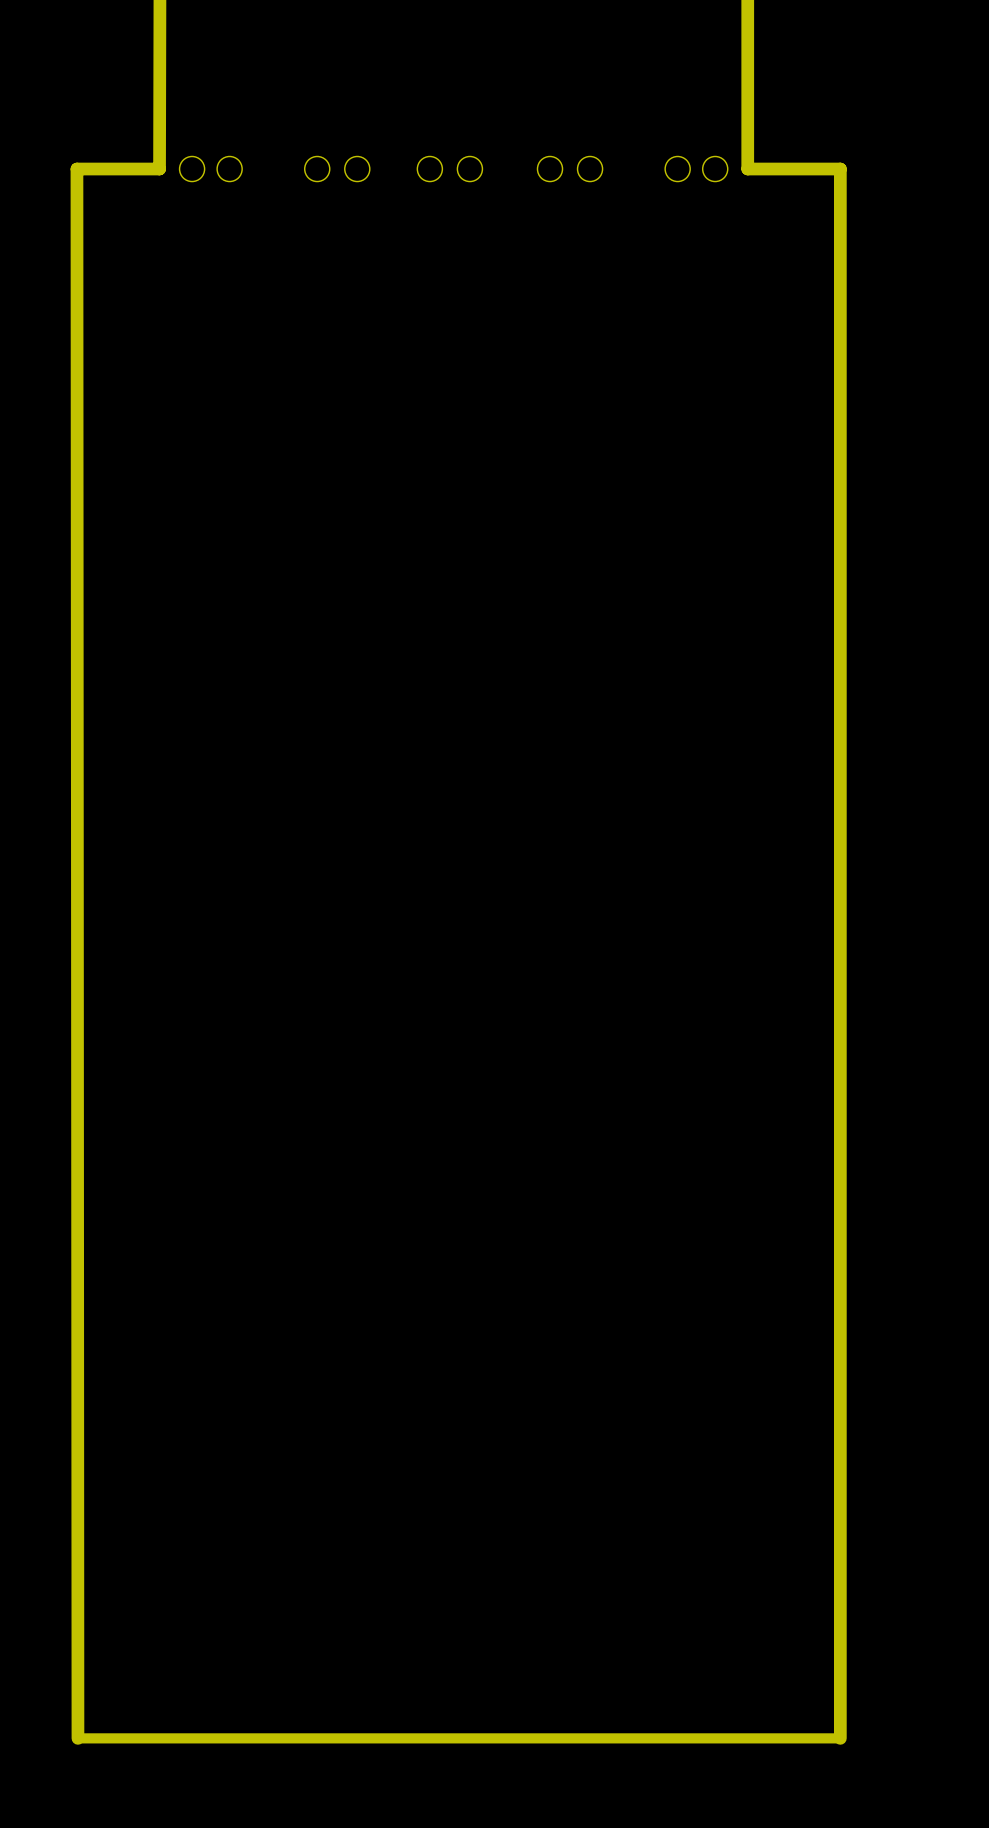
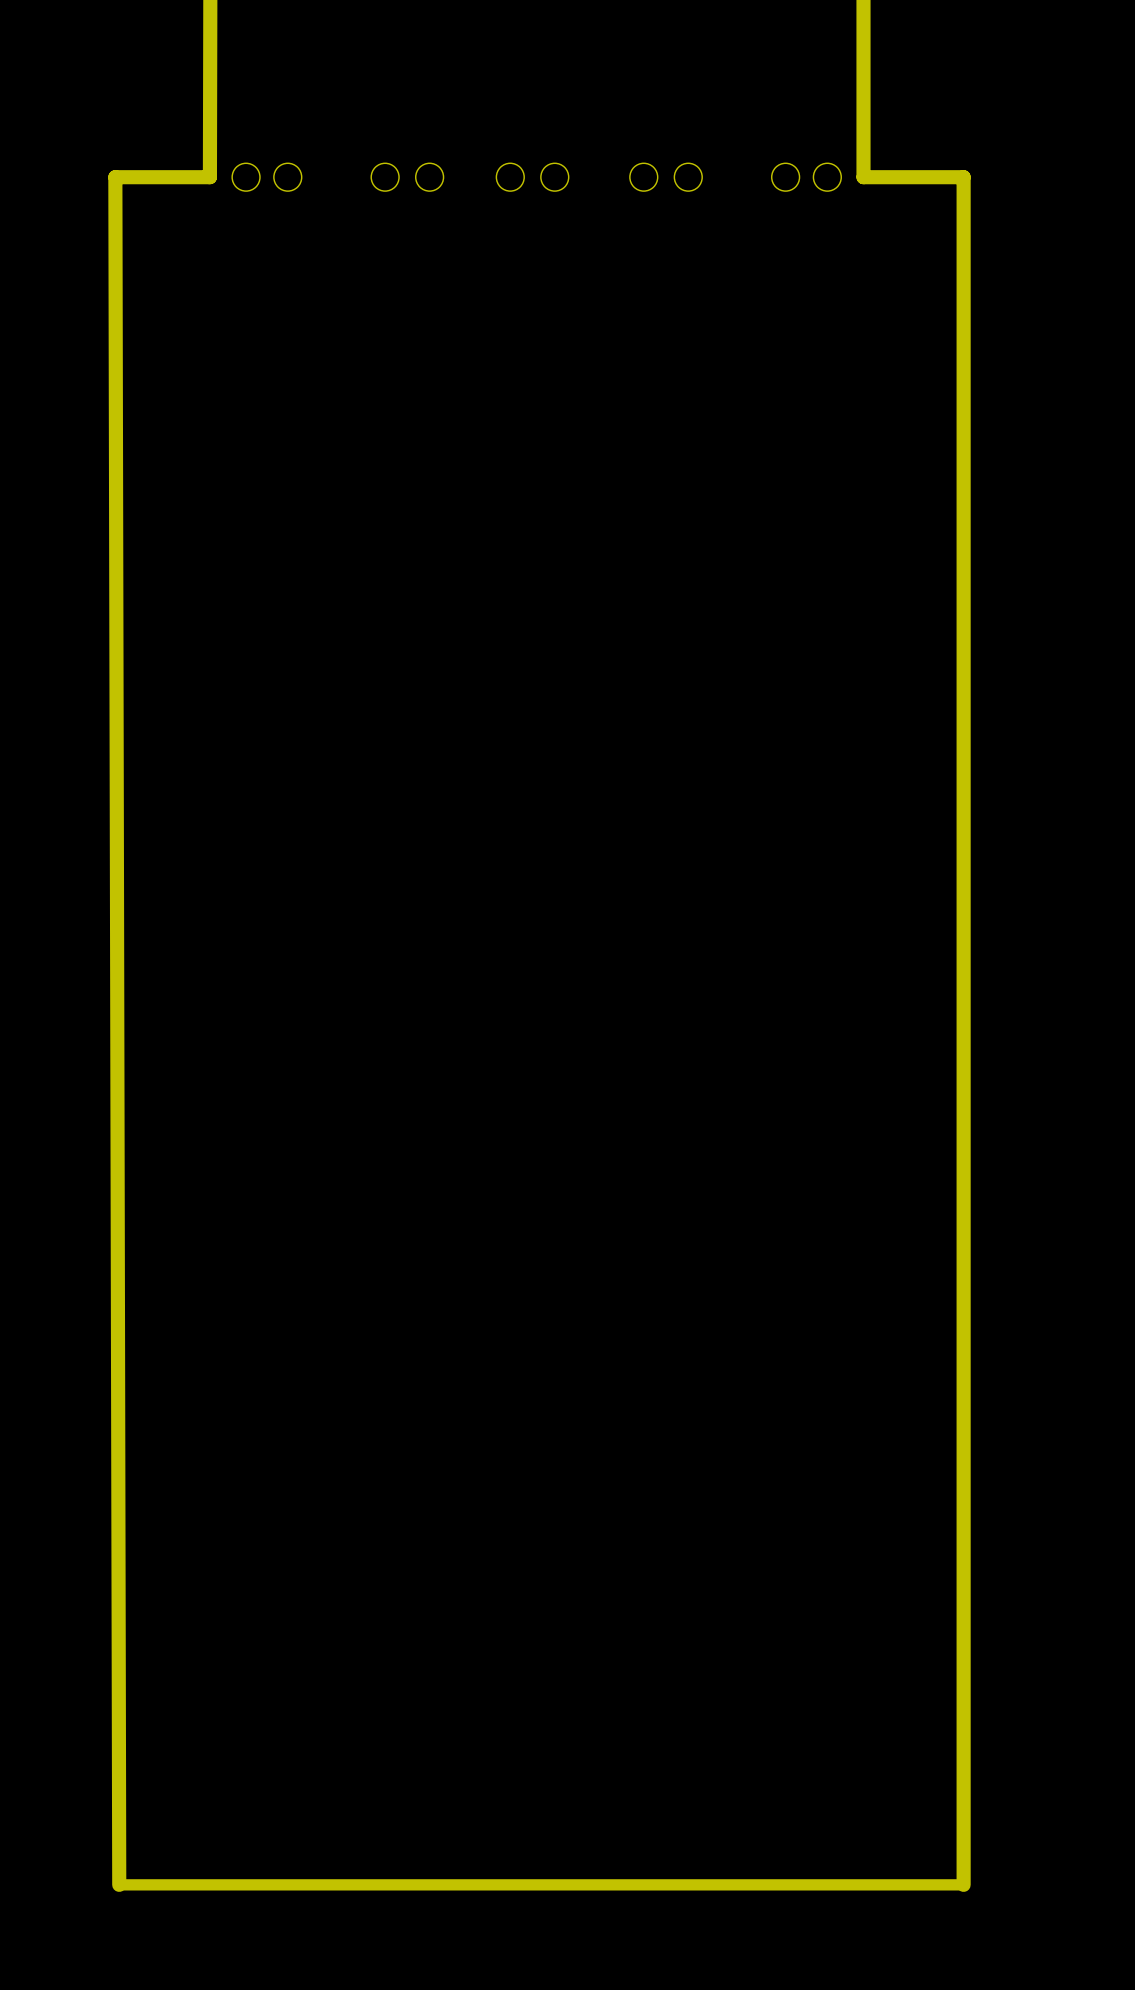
board edge: (837, 169) (840, 169) (840, 1738) (77, 1738) (76, 169) -> (963, 177) (963, 1884) (119, 1884) (115, 177) (118, 177)

